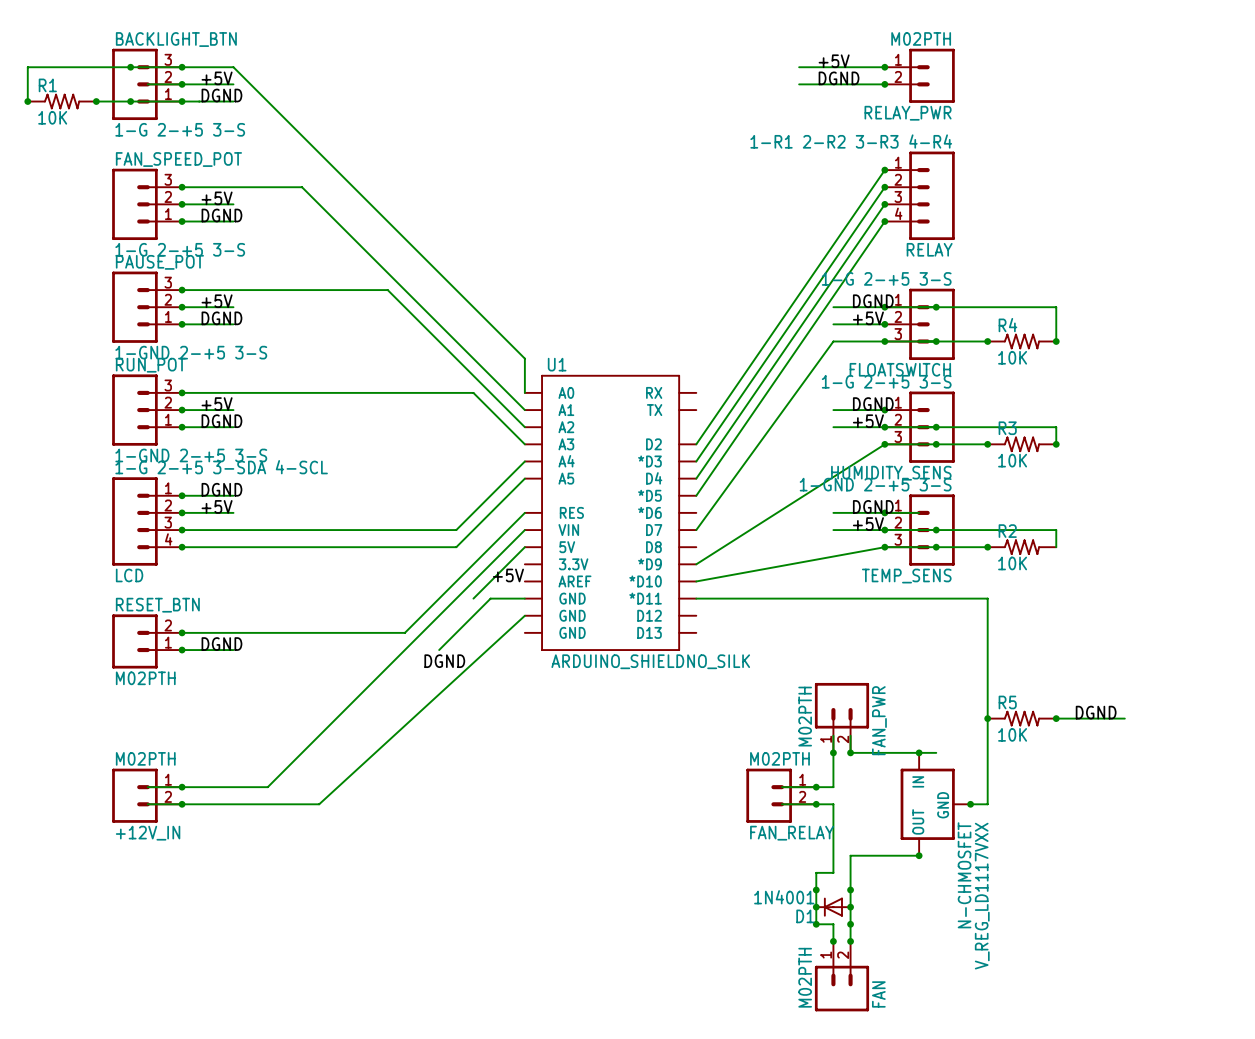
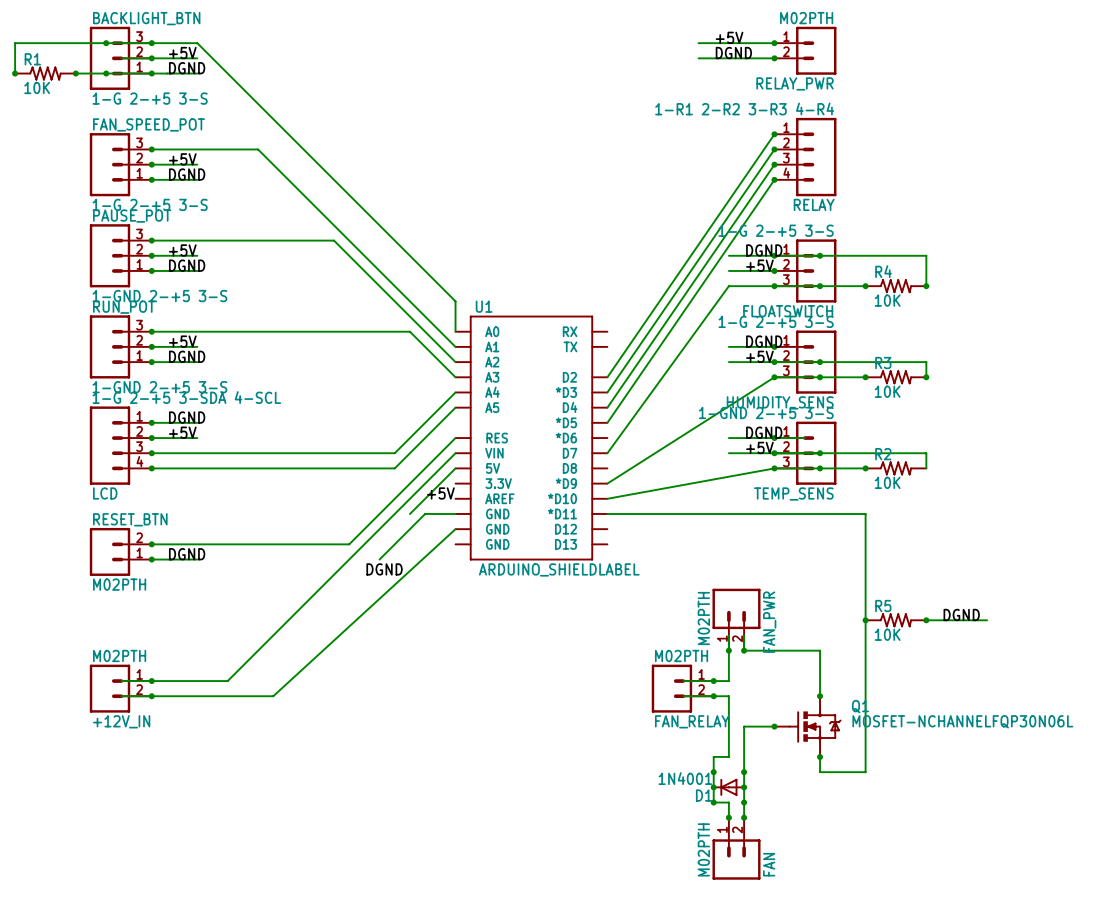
U1 value: ARDUINO_SHIELDNO_SILK (650, 661) -> ARDUINO_SHIELDLABEL (559, 569)
junction: (919, 752) -> none
wire: none -> (820, 650) (820, 696)
N-CHMOSFET: V_REG_LD1117VXX (935, 804) -> none
junction: none -> (820, 696)
wire: (970, 804) (987, 804) -> (820, 756) (820, 772) (865, 772) (865, 696)
junction: (970, 804) -> none
junction: none -> (774, 726)
Q1: none -> MOSFET-NCHANNELFQP30N06L (807, 726)
wire: (850, 855) (919, 855) -> (744, 741) (744, 726) (774, 726)
junction: (919, 855) -> none
junction: none -> (820, 756)

